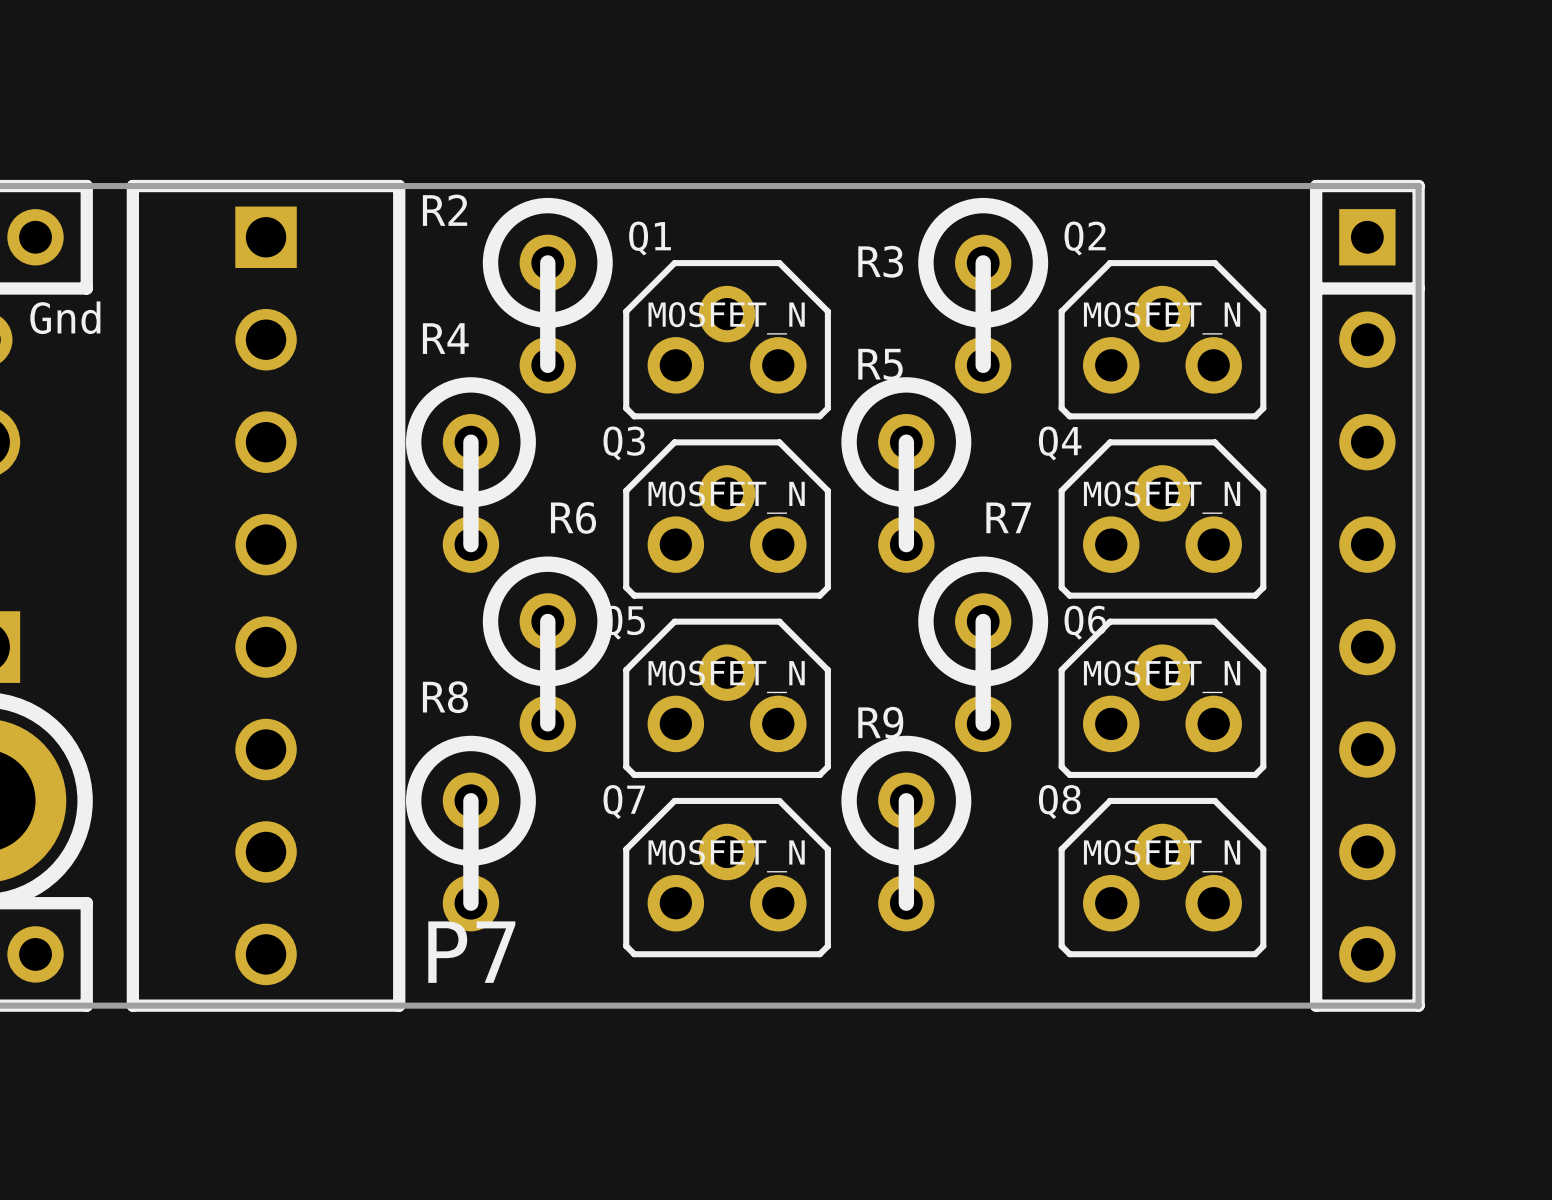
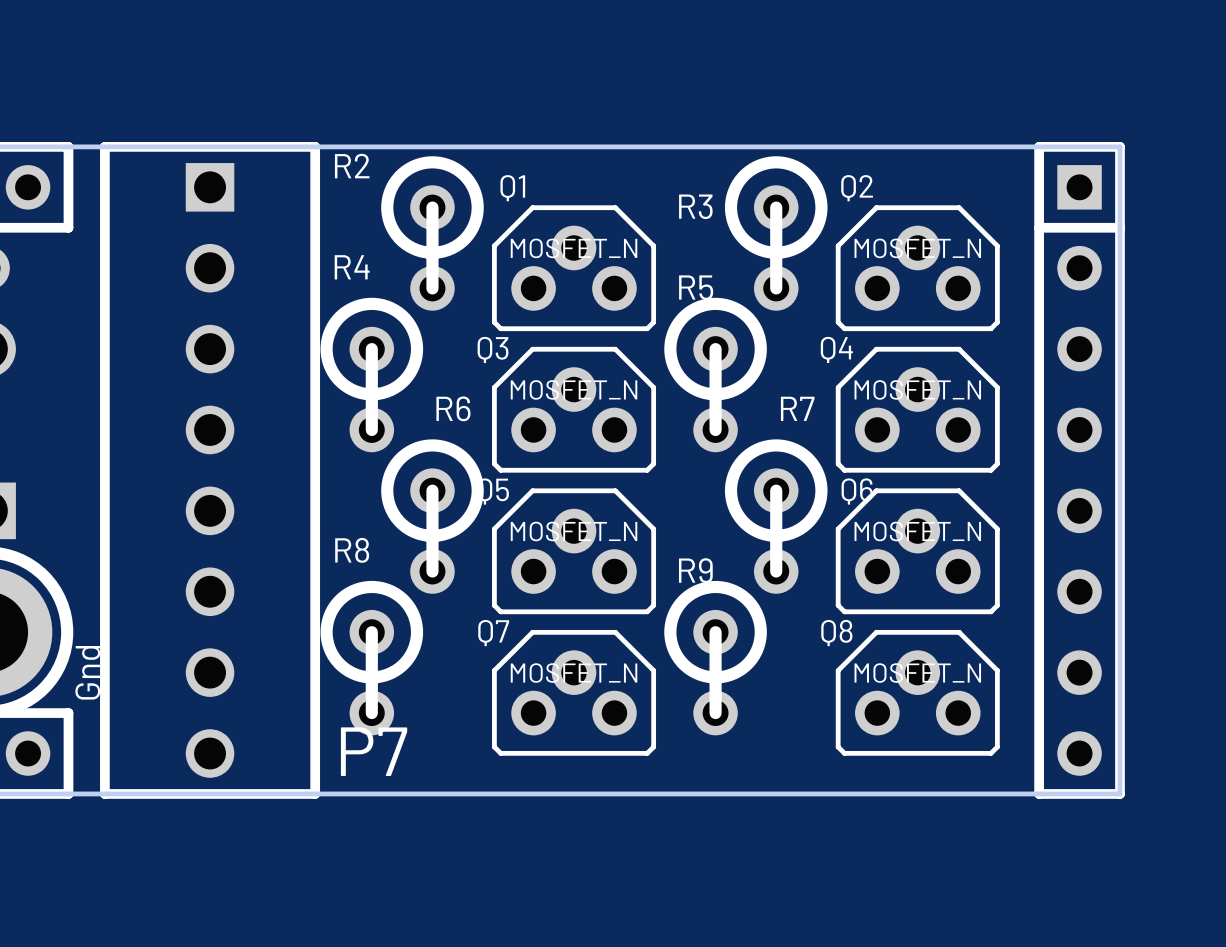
text rotation: 0° (65, 317) -> 90° counterclockwise (87, 672)
text position: Gnd (65, 317) -> Gnd (87, 672)

